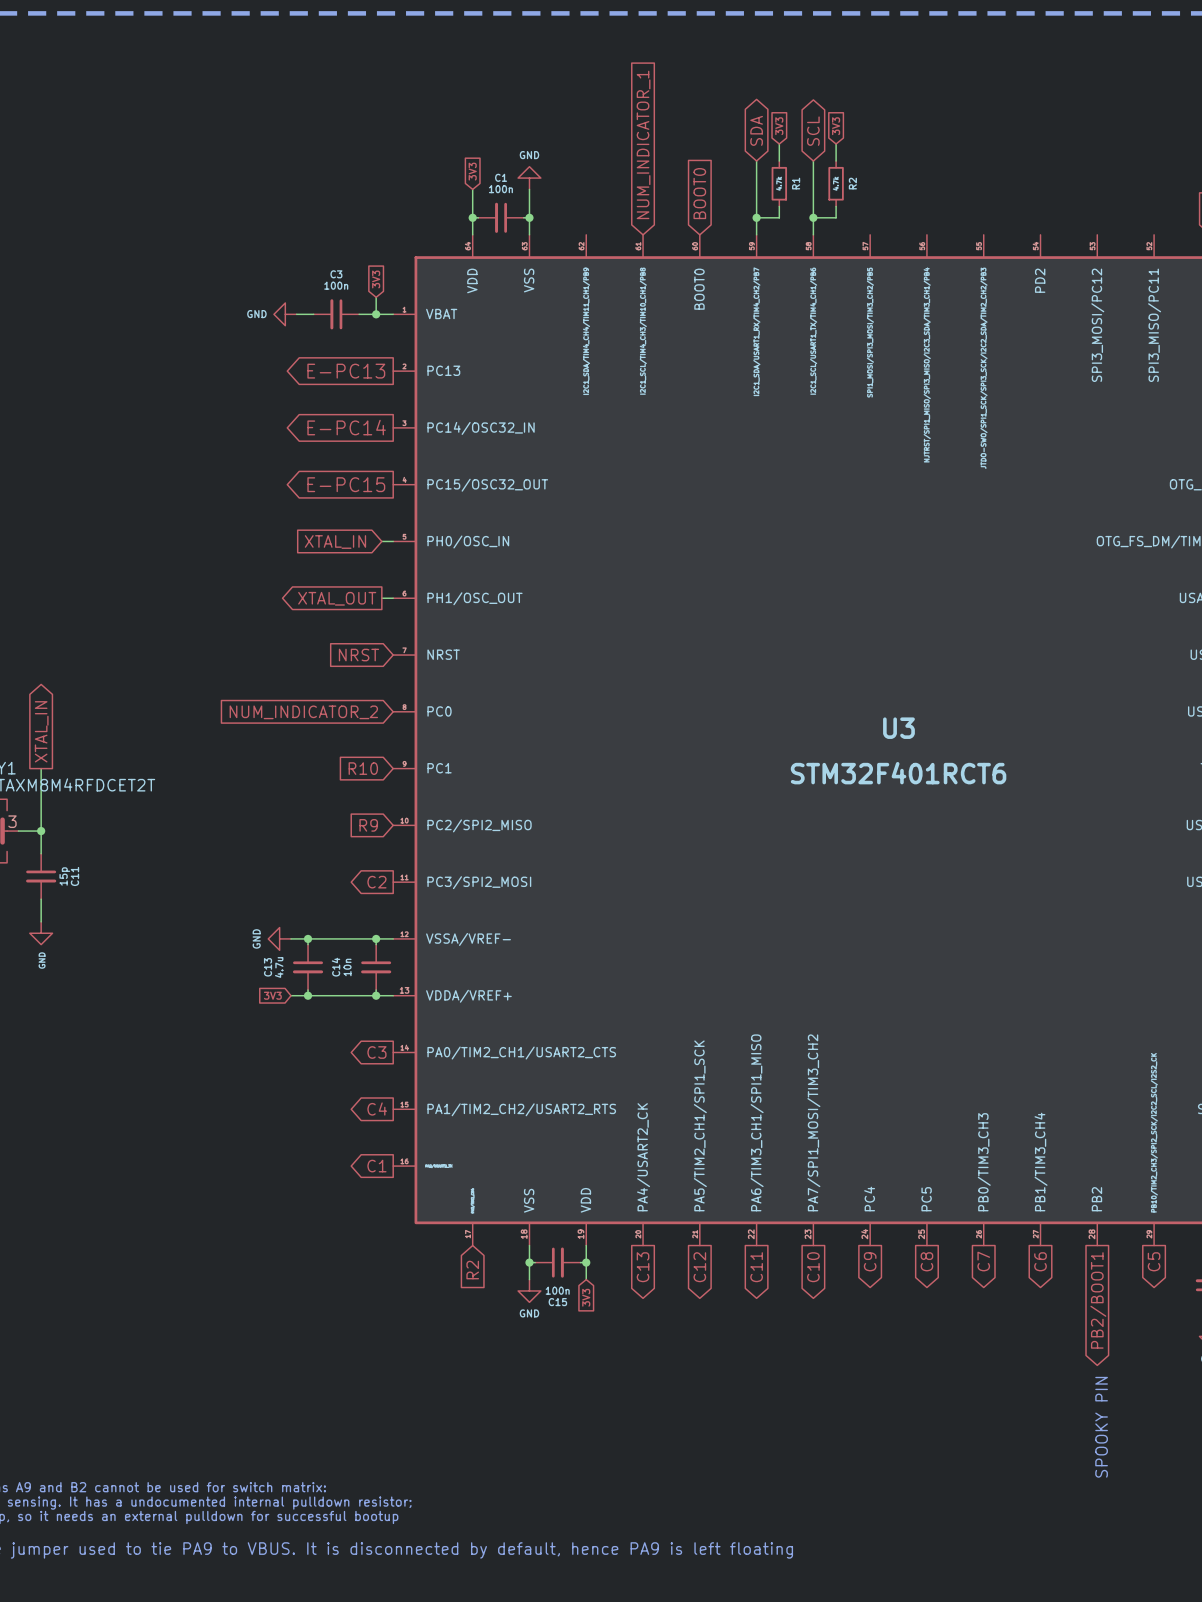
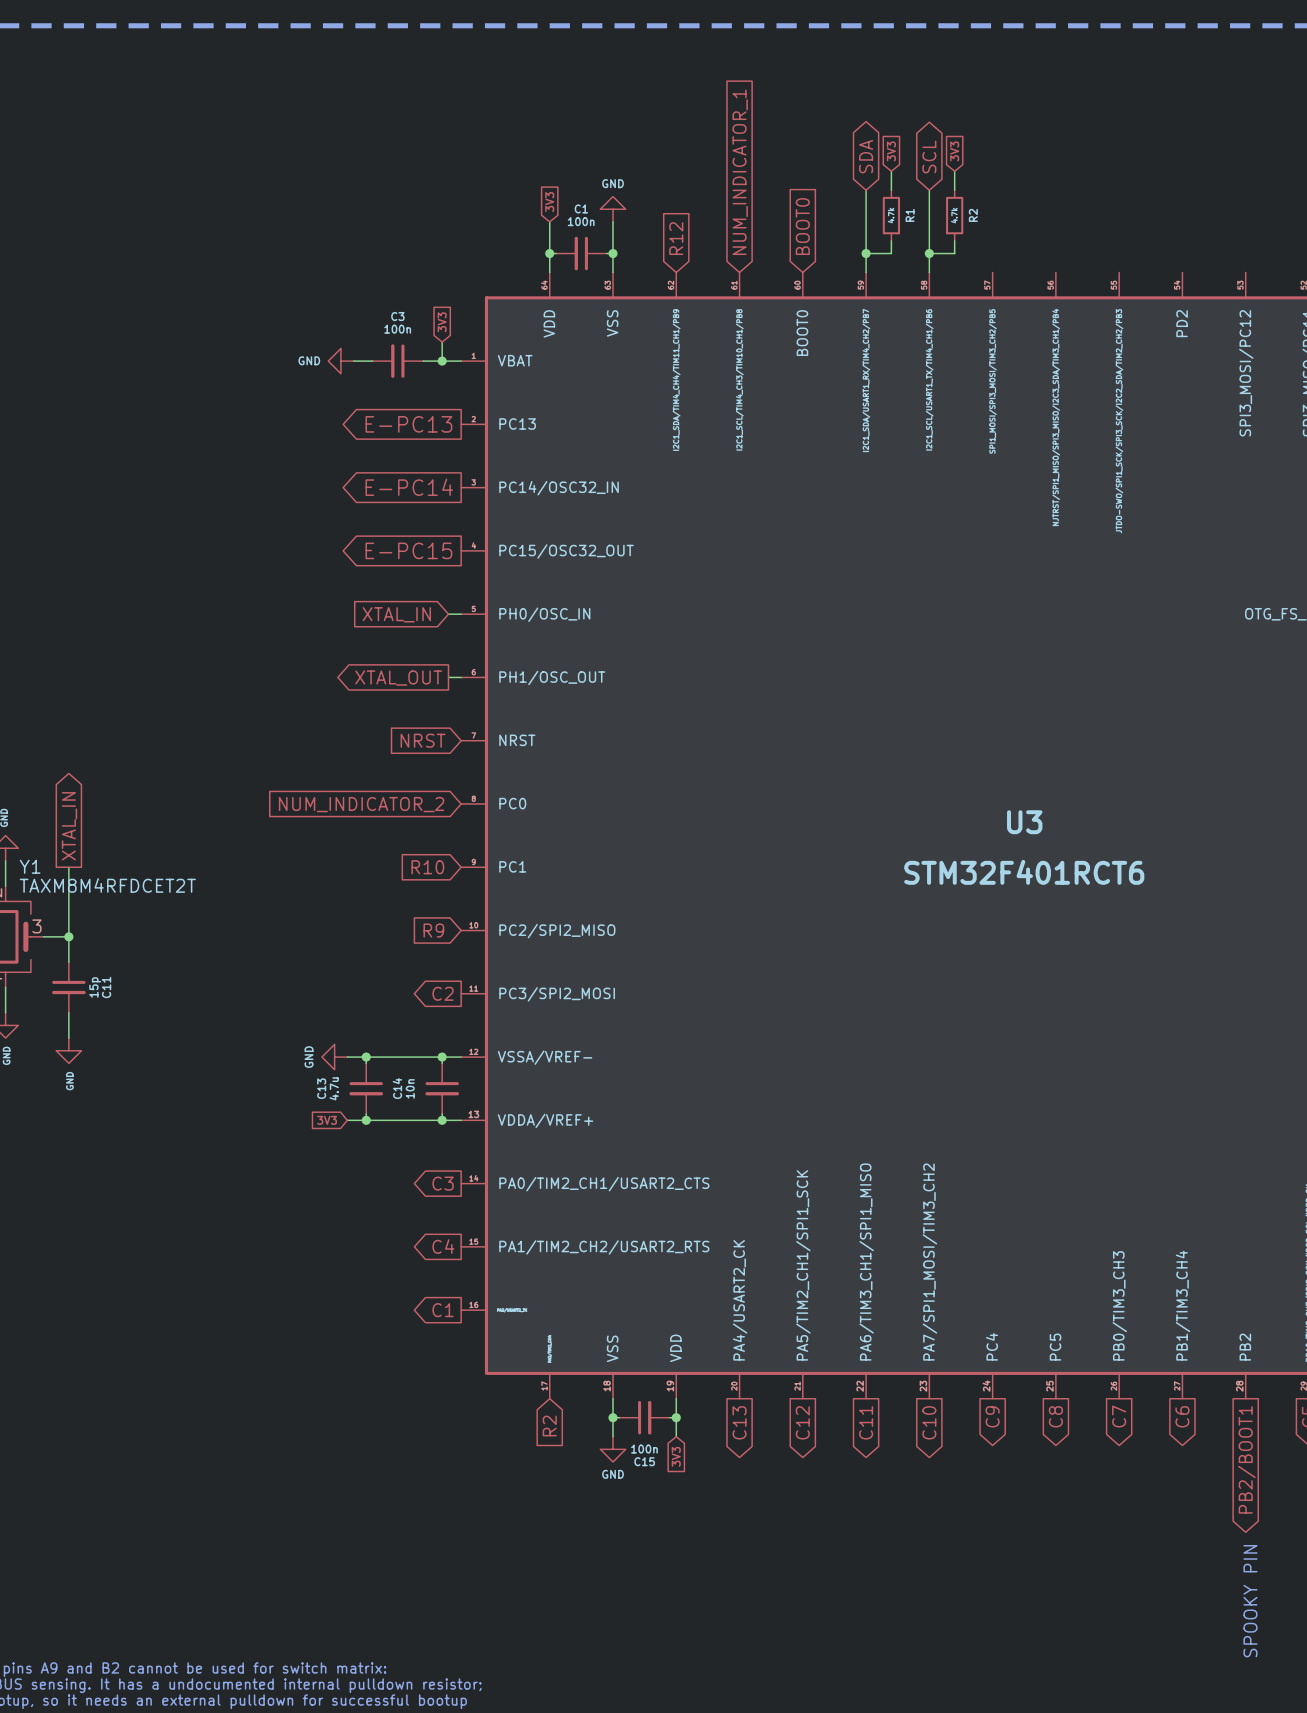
global label: none -> R12 (676, 238)

